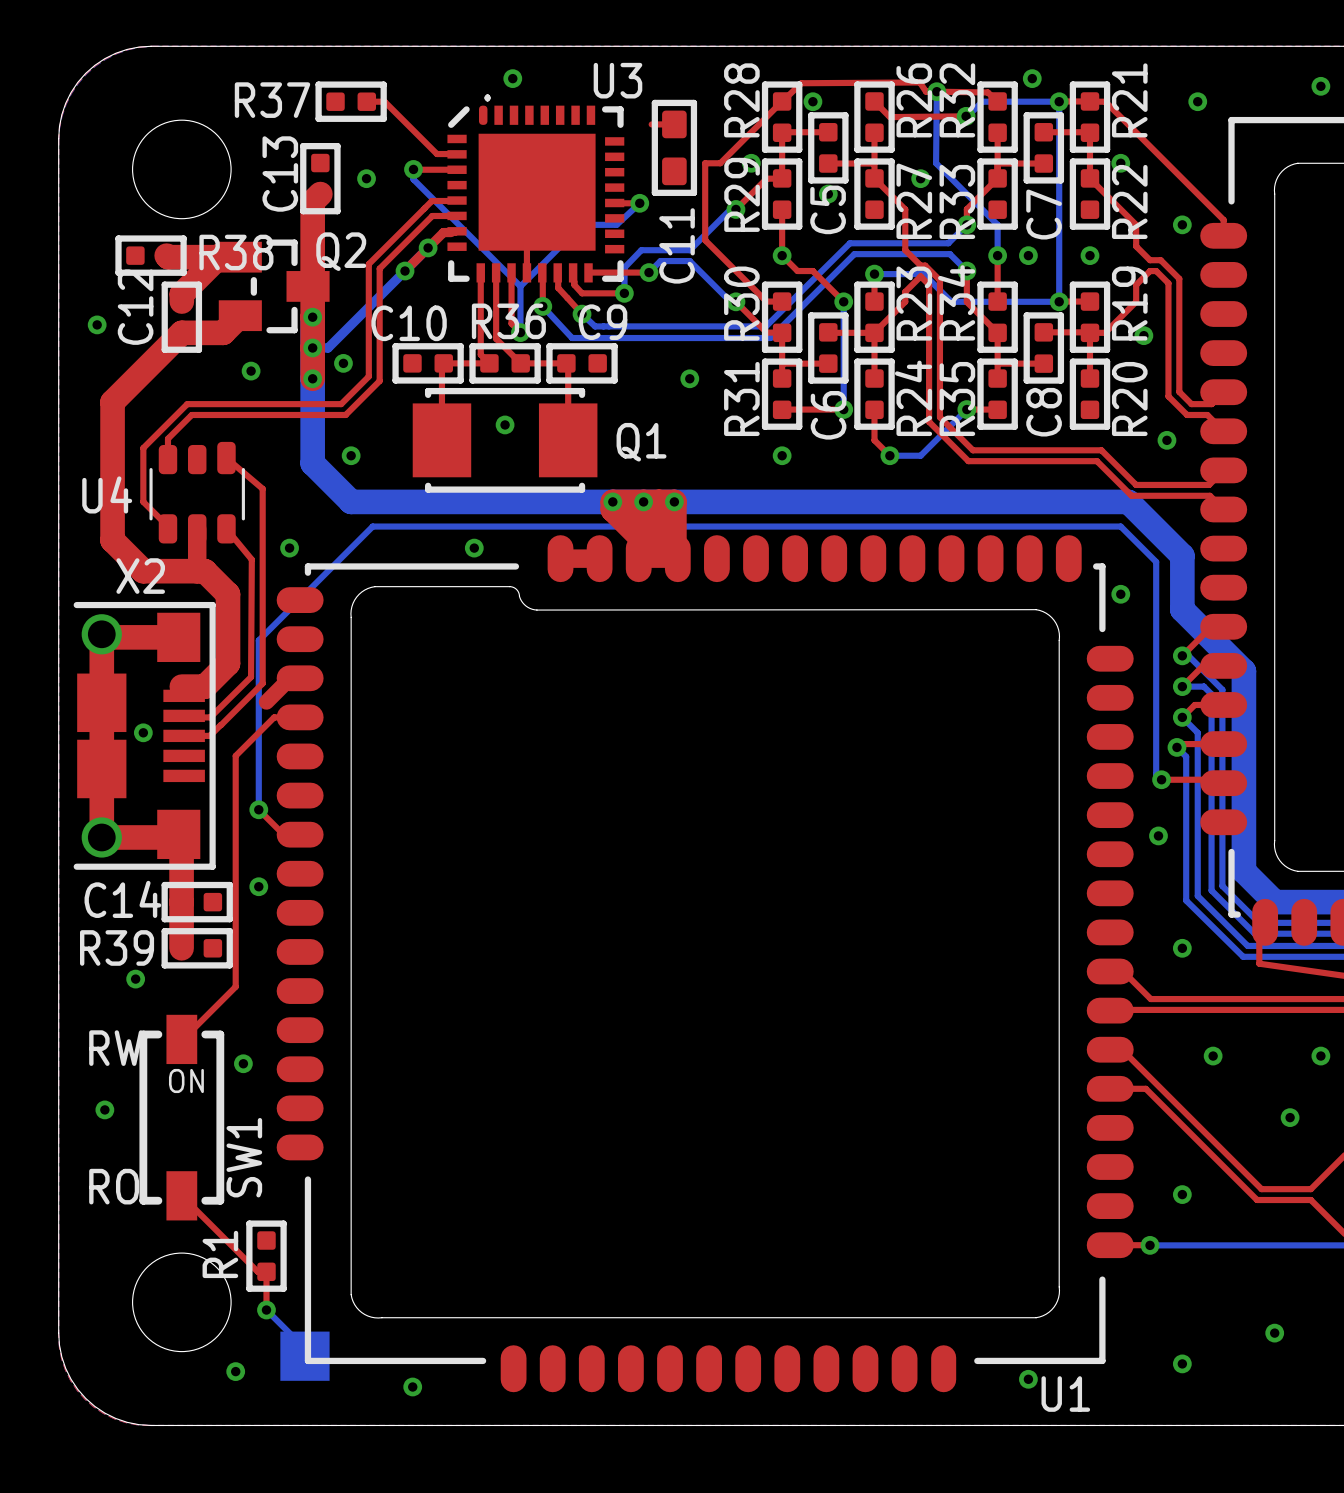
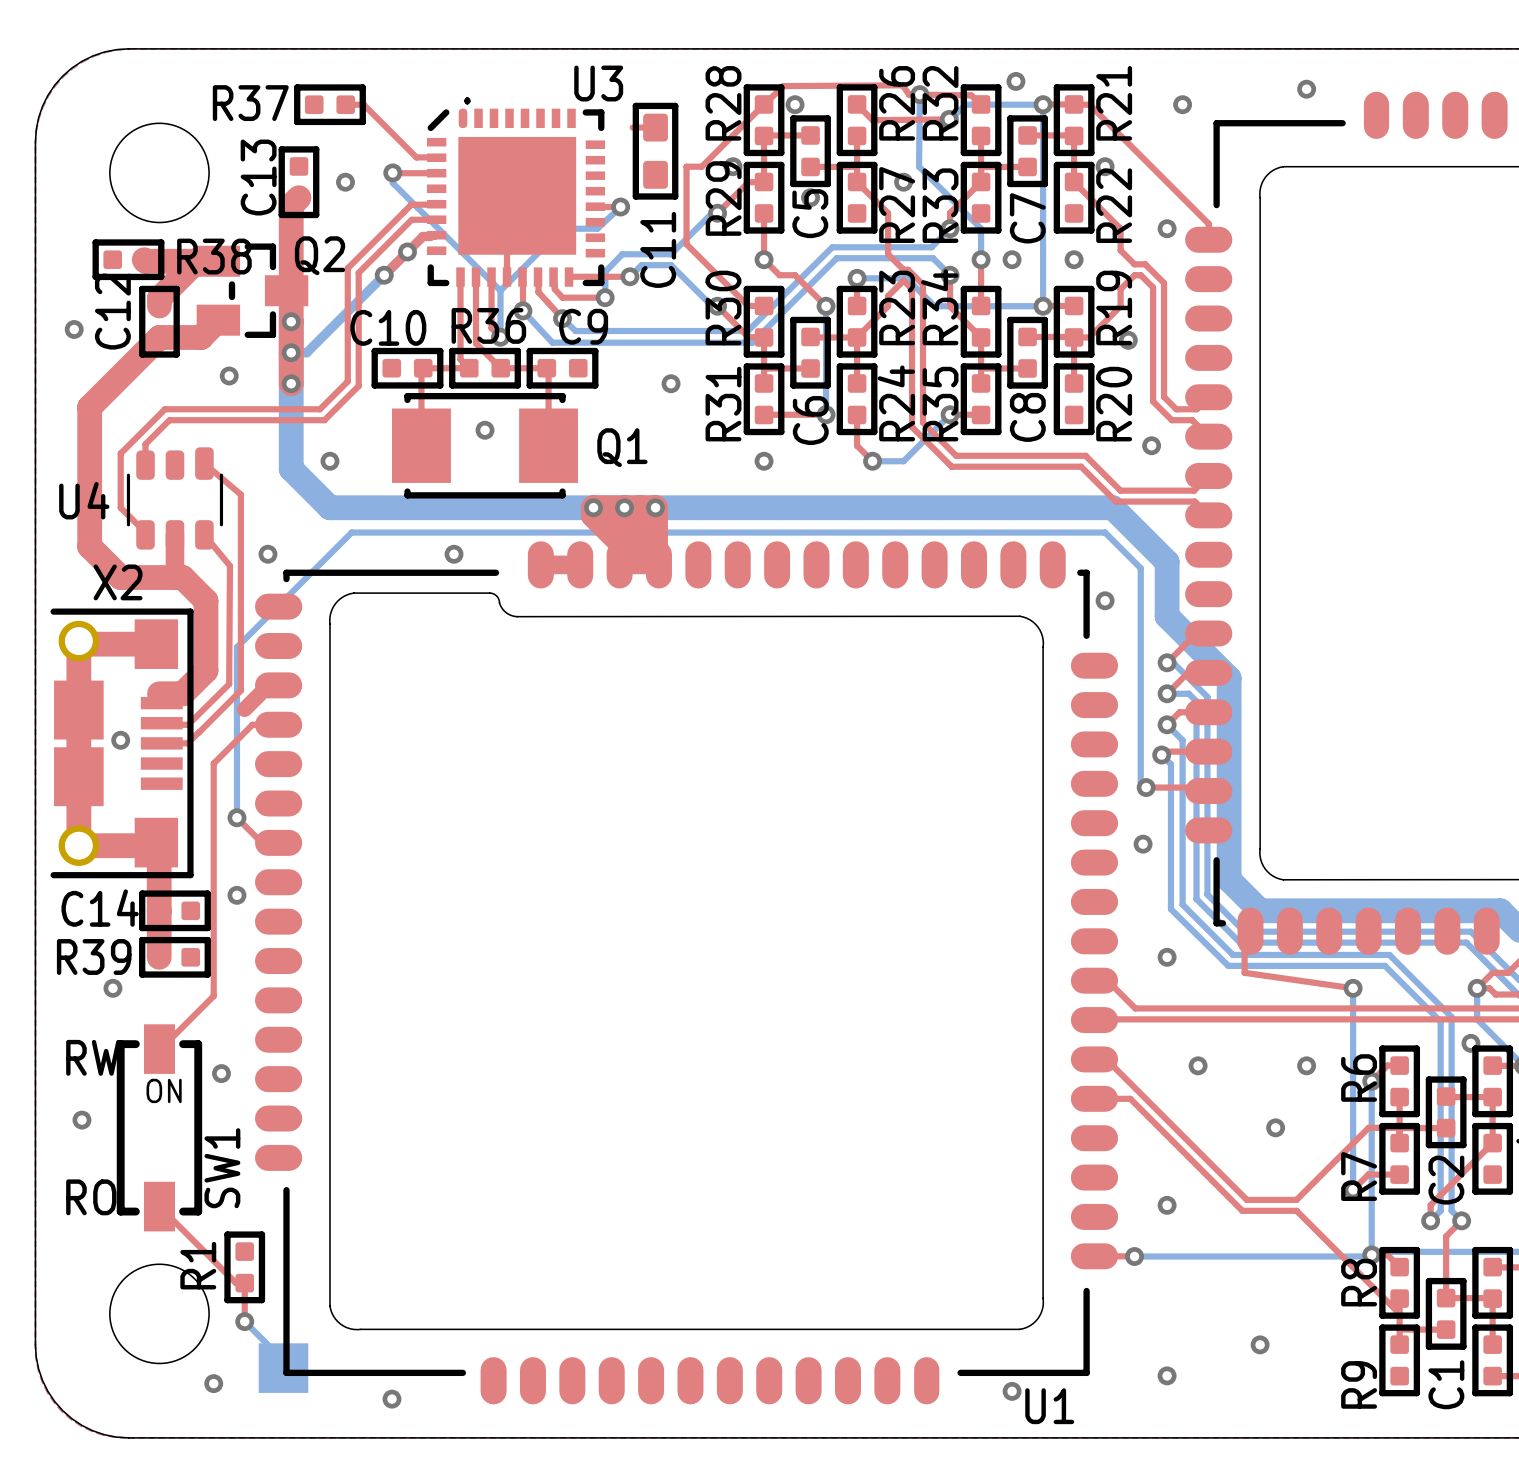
via: (512, 78) -> none
via: (343, 363) -> none

